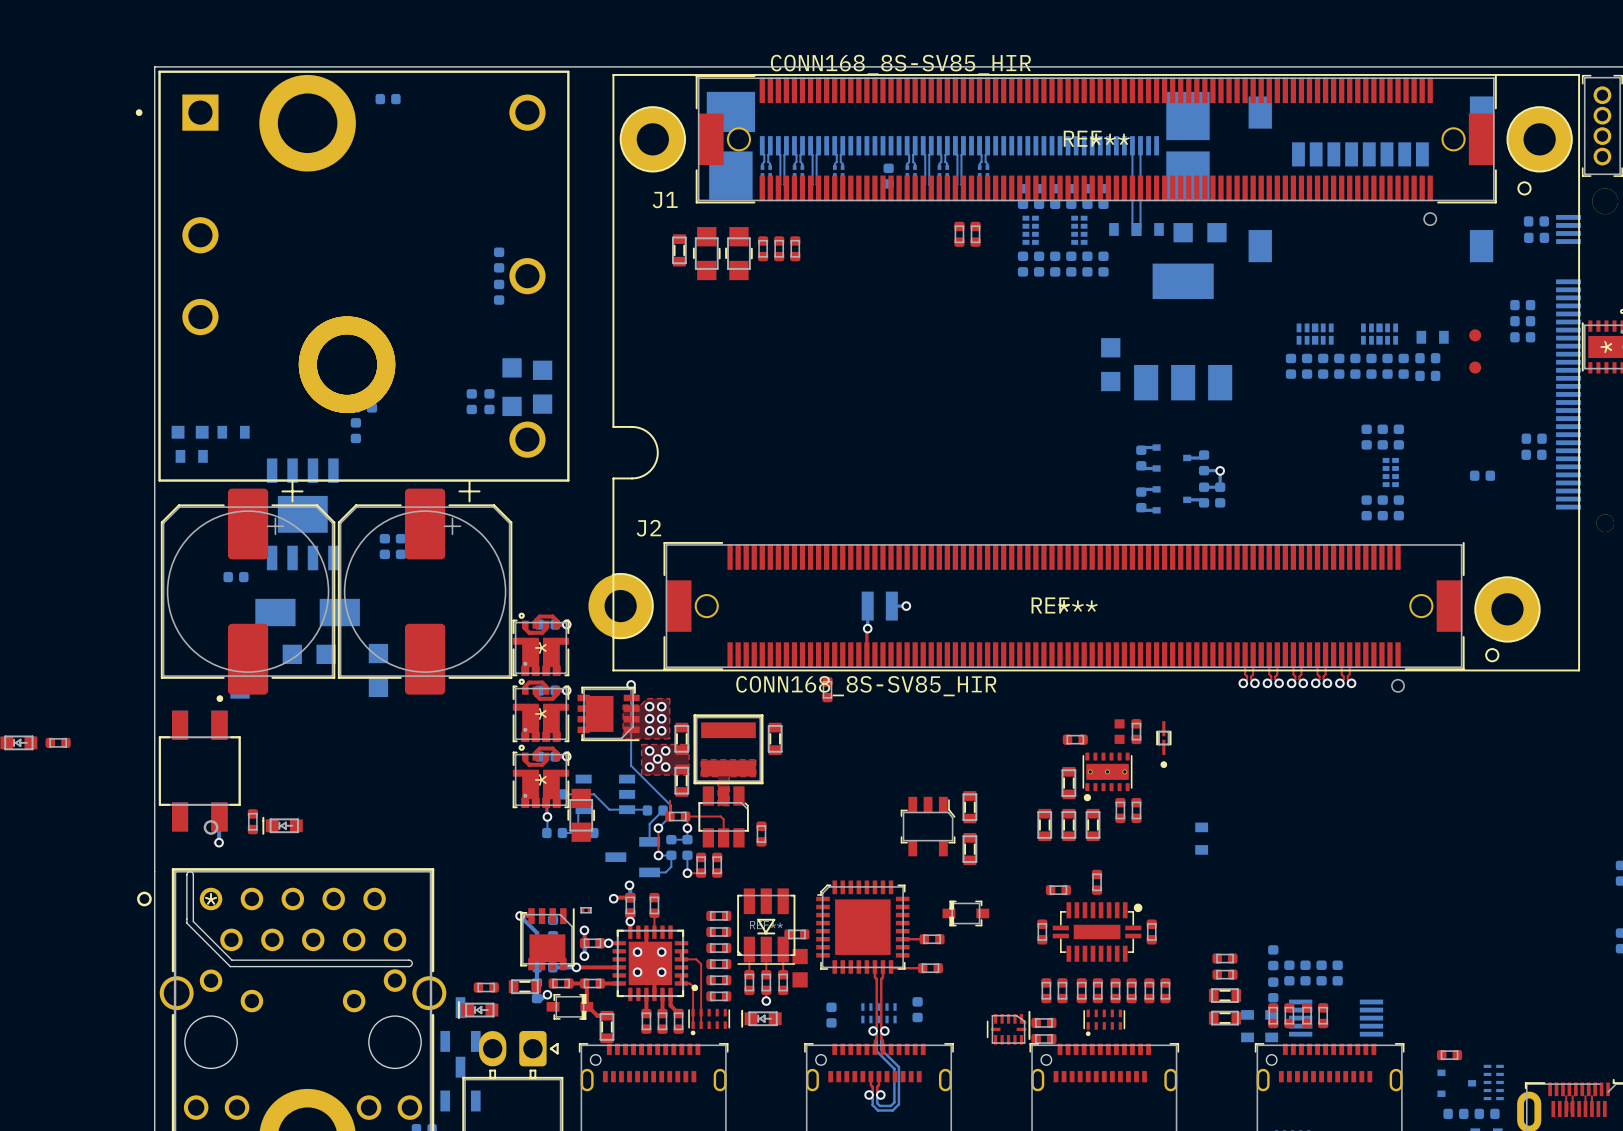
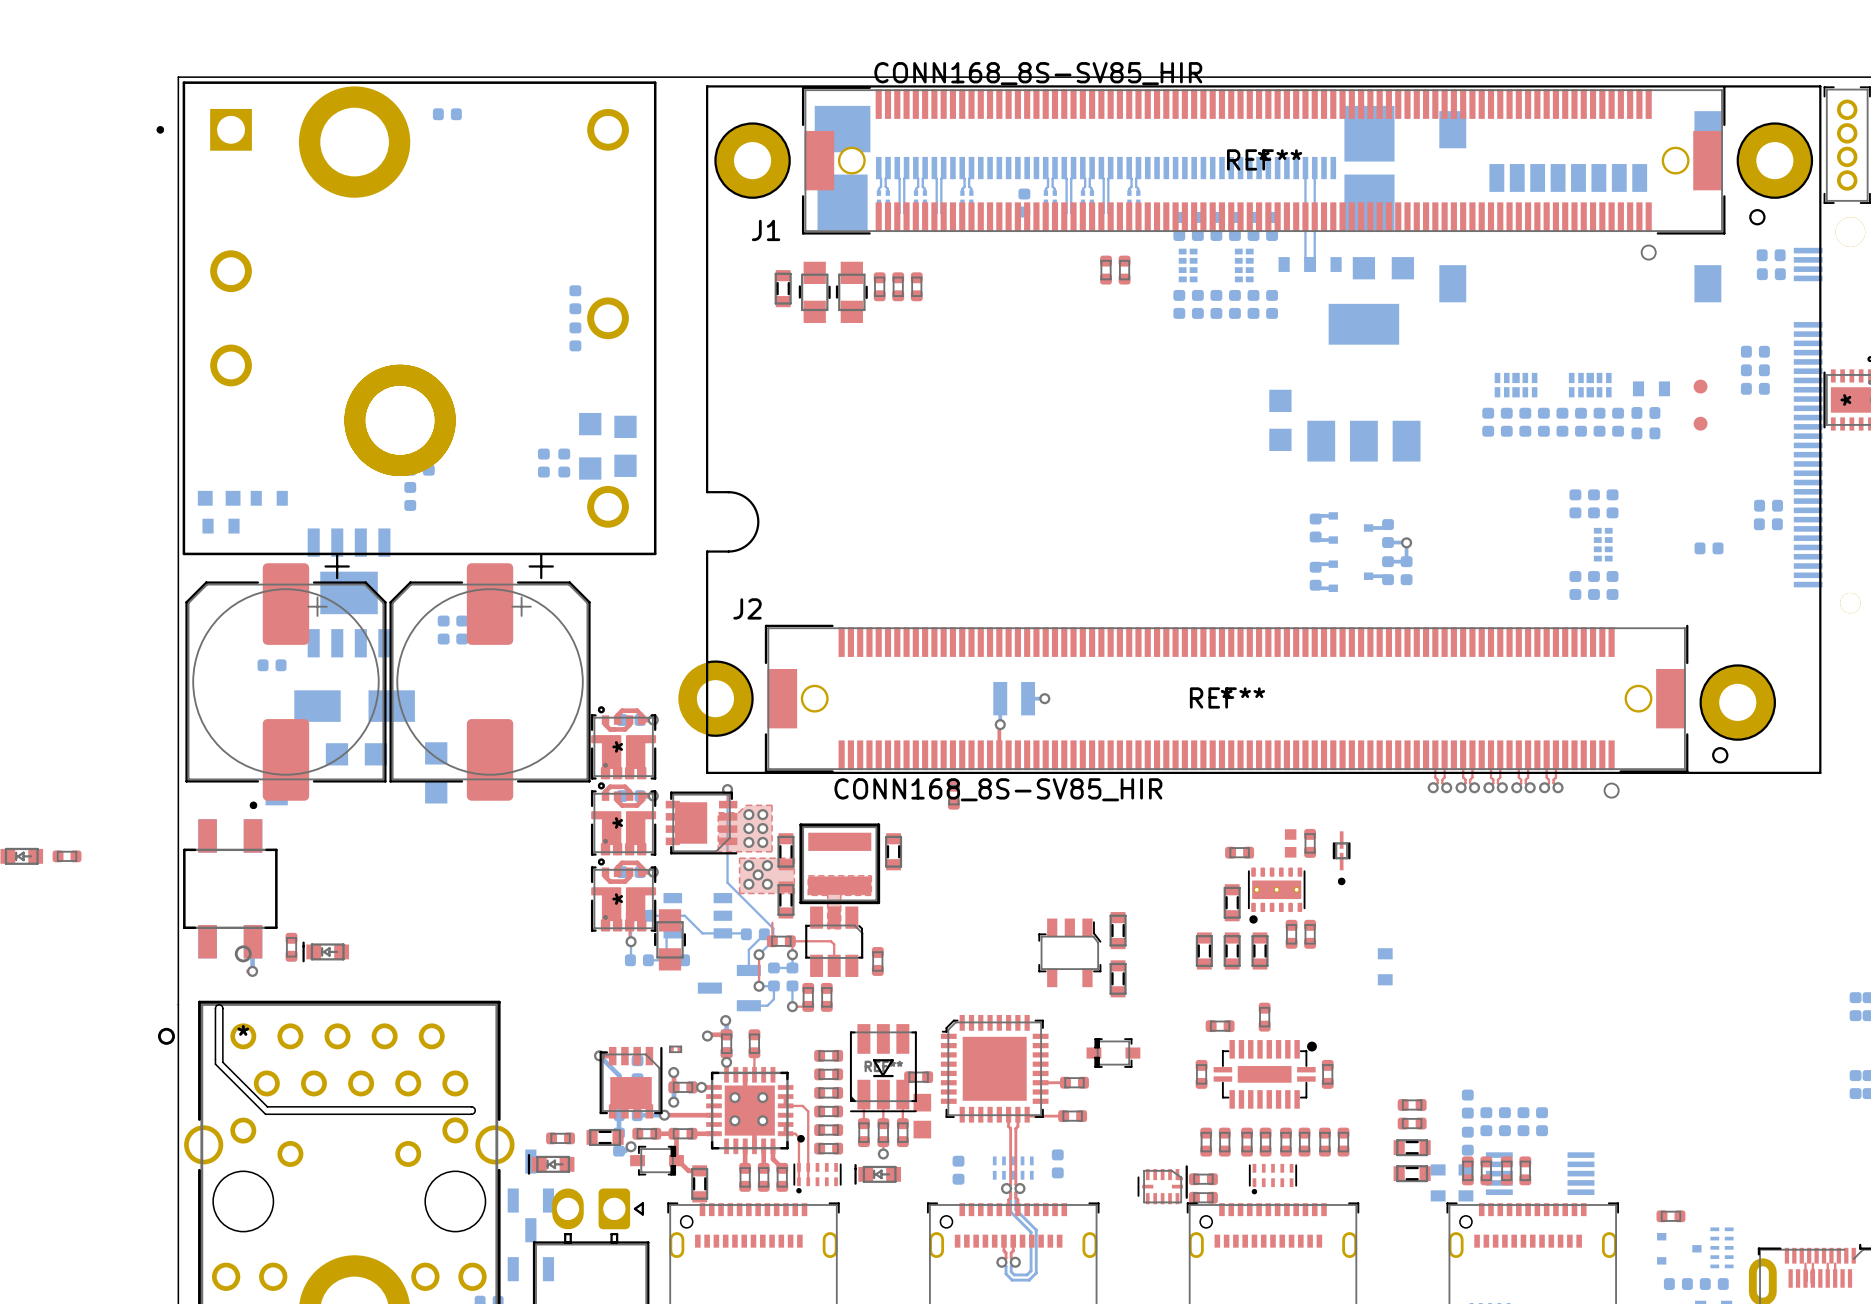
part: none -> (1855, 1006)
part: none -> (1855, 1084)

